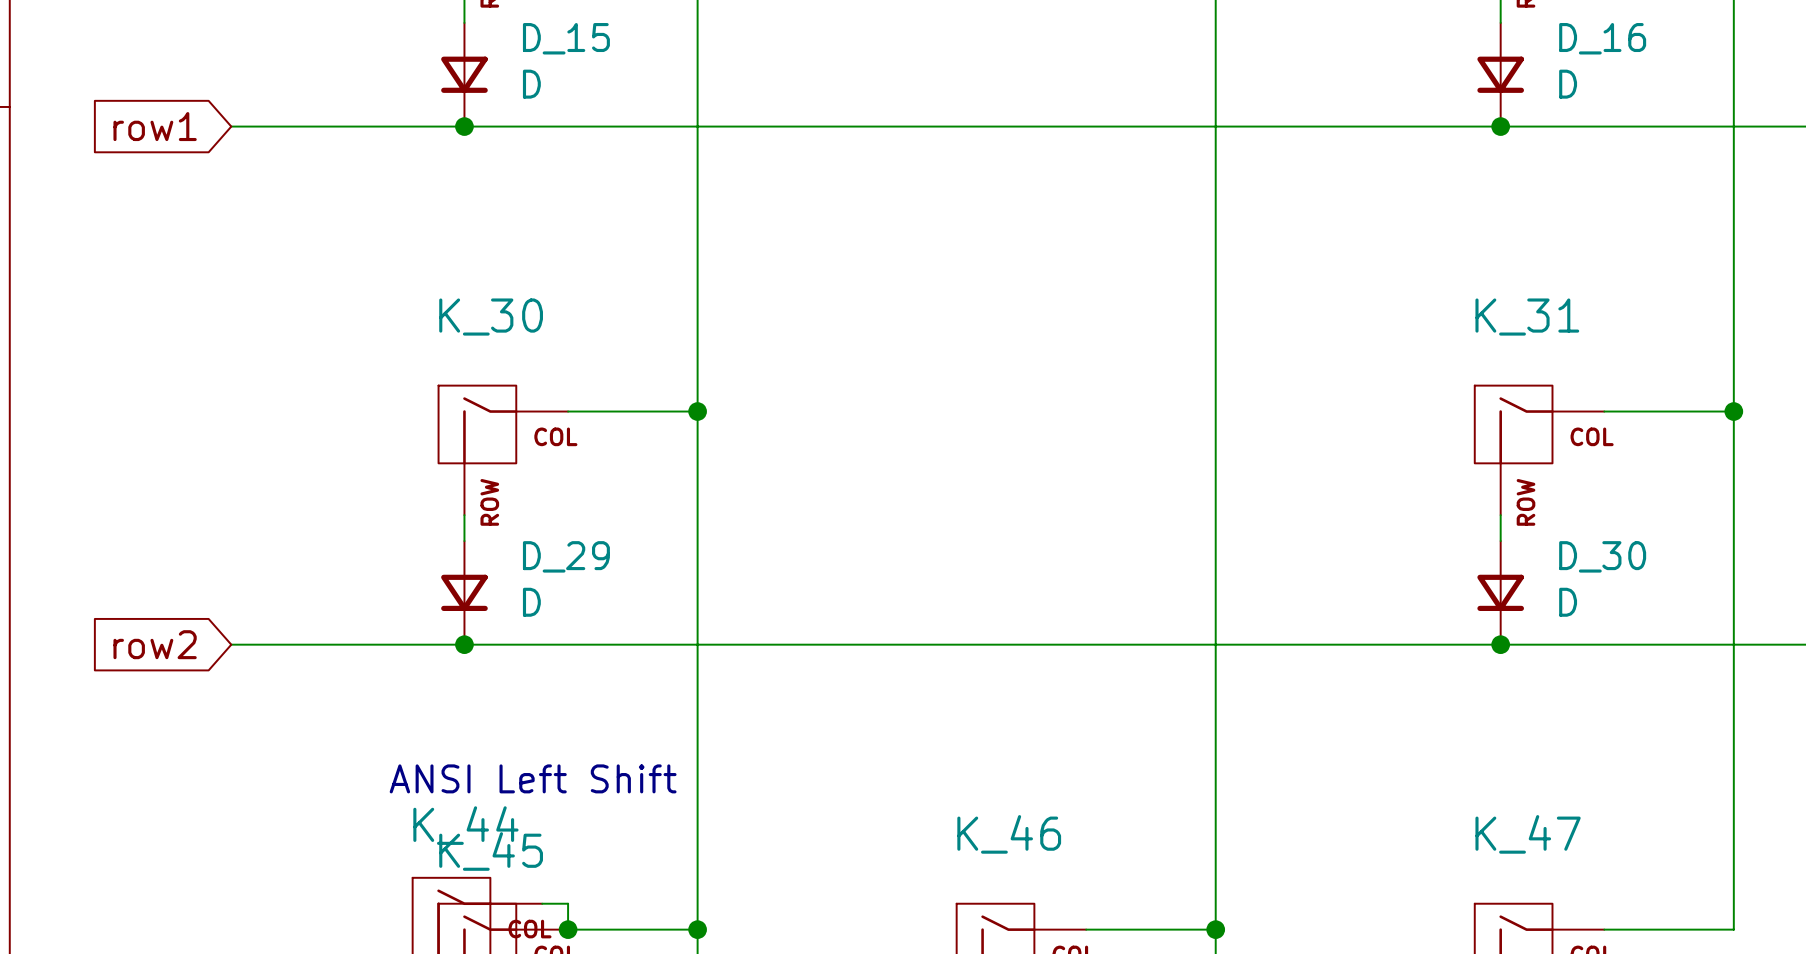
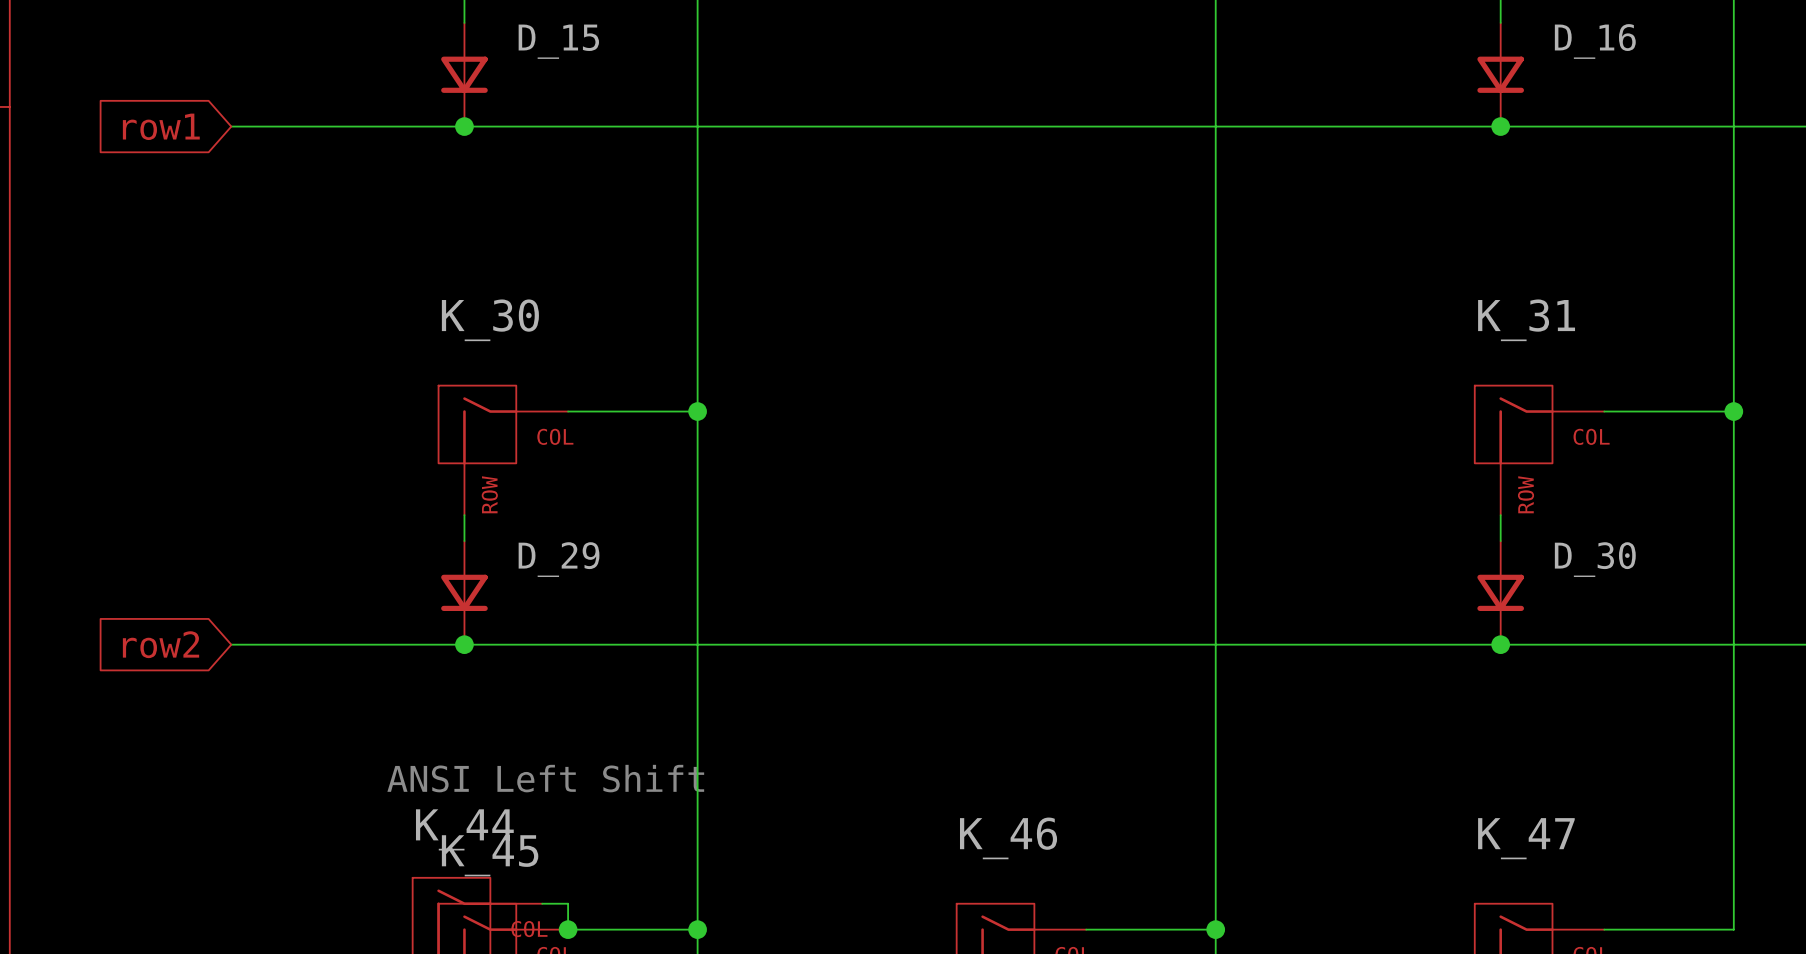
D_15 value: D (531, 84) -> none
D_16 value: D (1568, 84) -> none
D_29 value: D (531, 602) -> none
D_30 value: D (1568, 602) -> none

